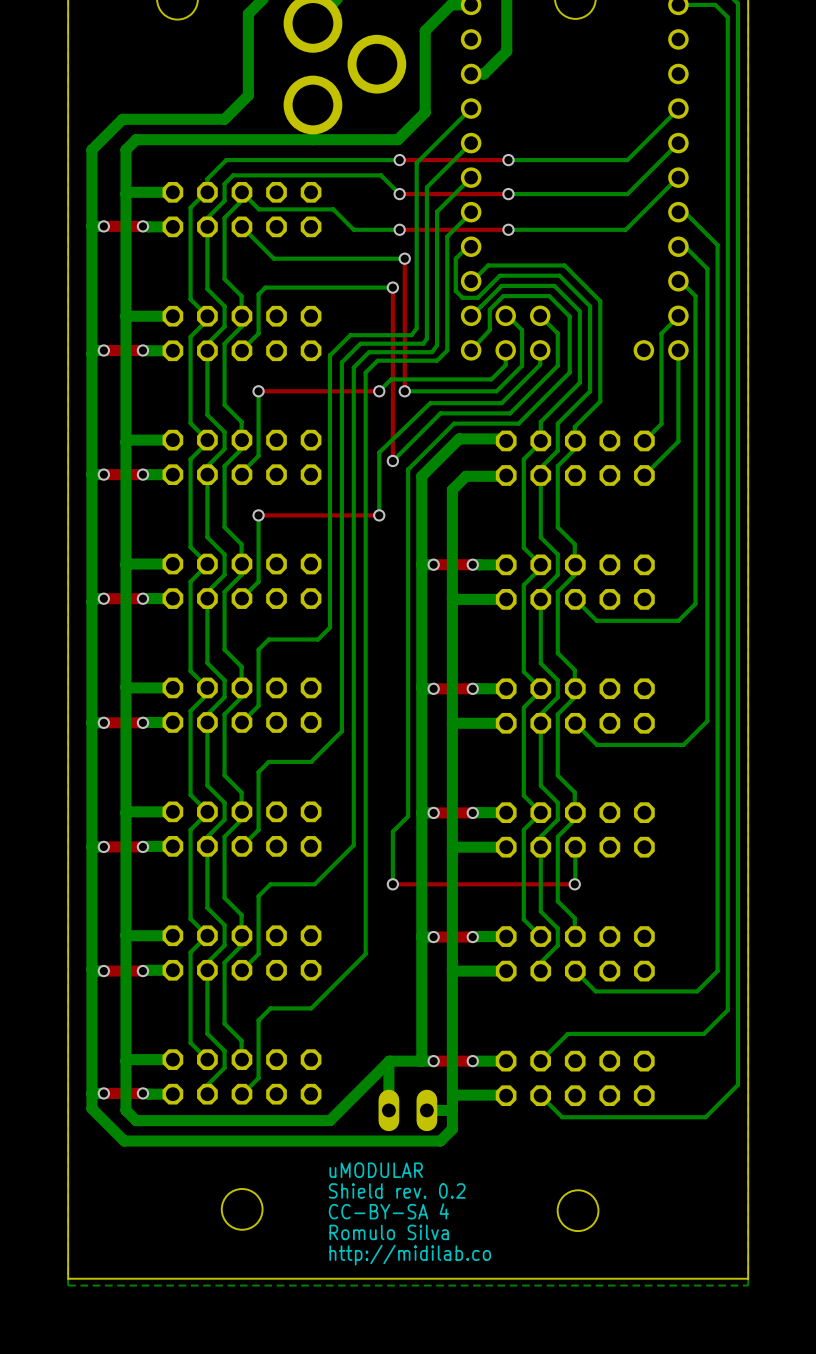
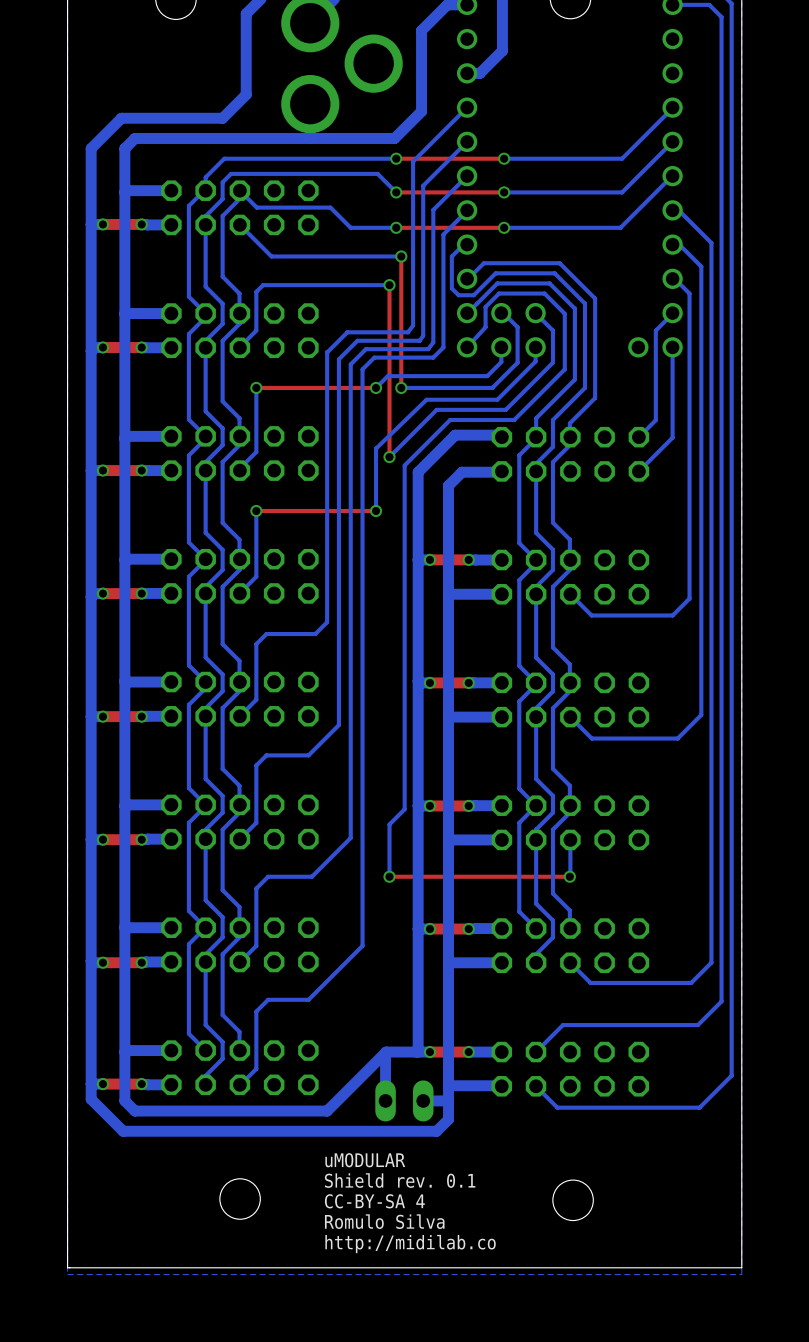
text: Shield rev. 0.2 (397, 1190) -> Shield rev. 0.1 (400, 1180)

